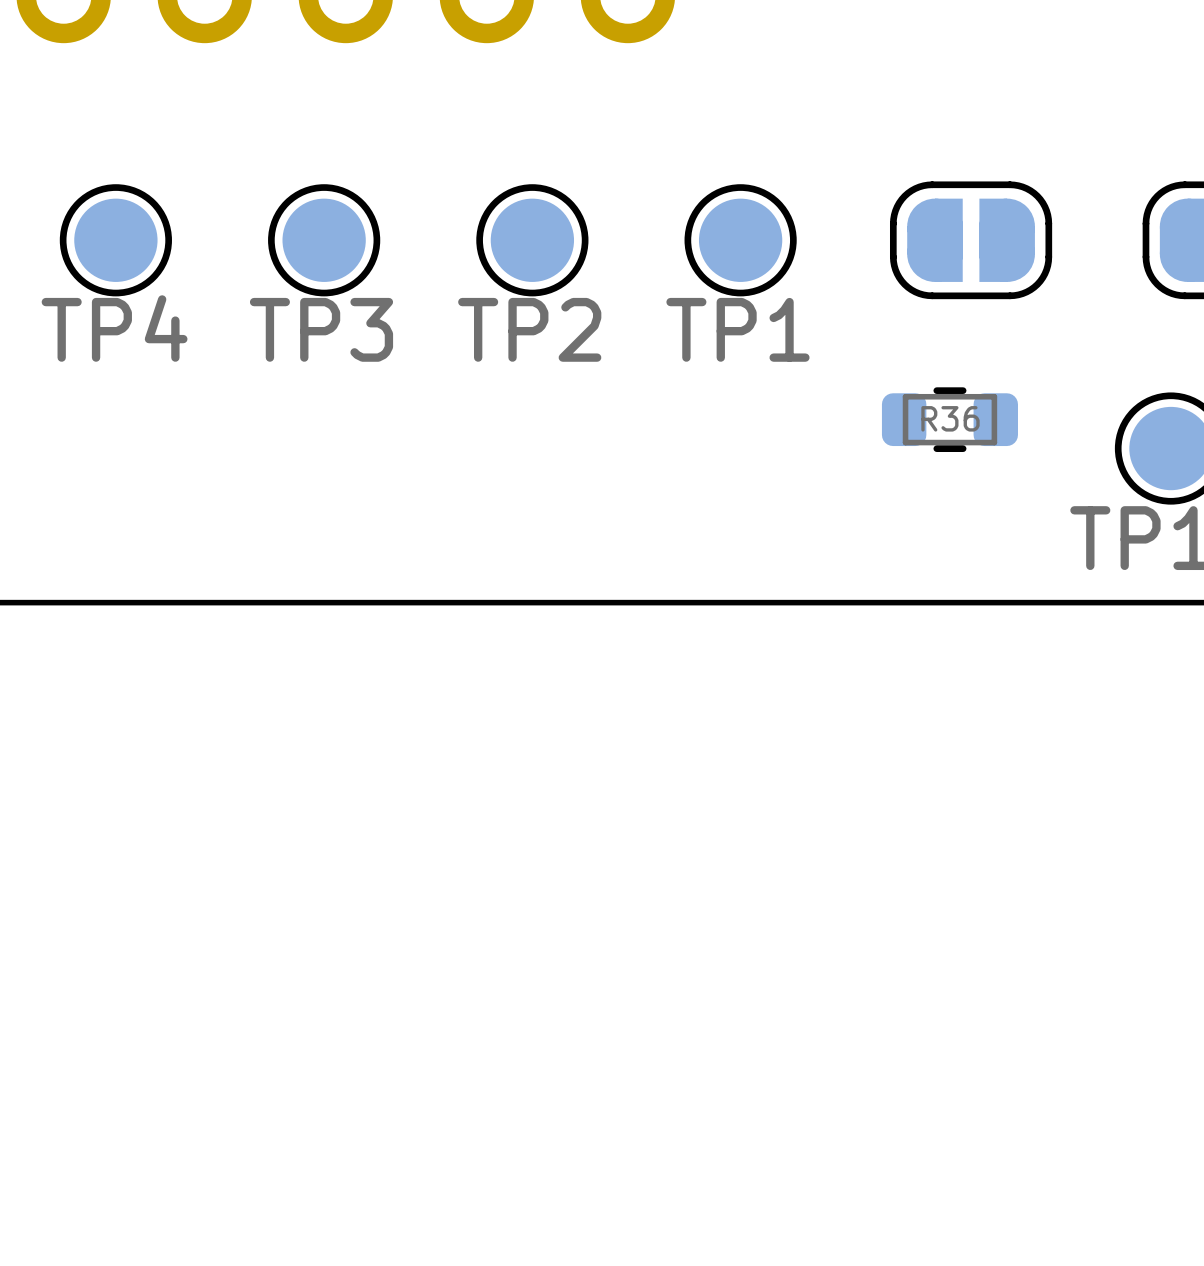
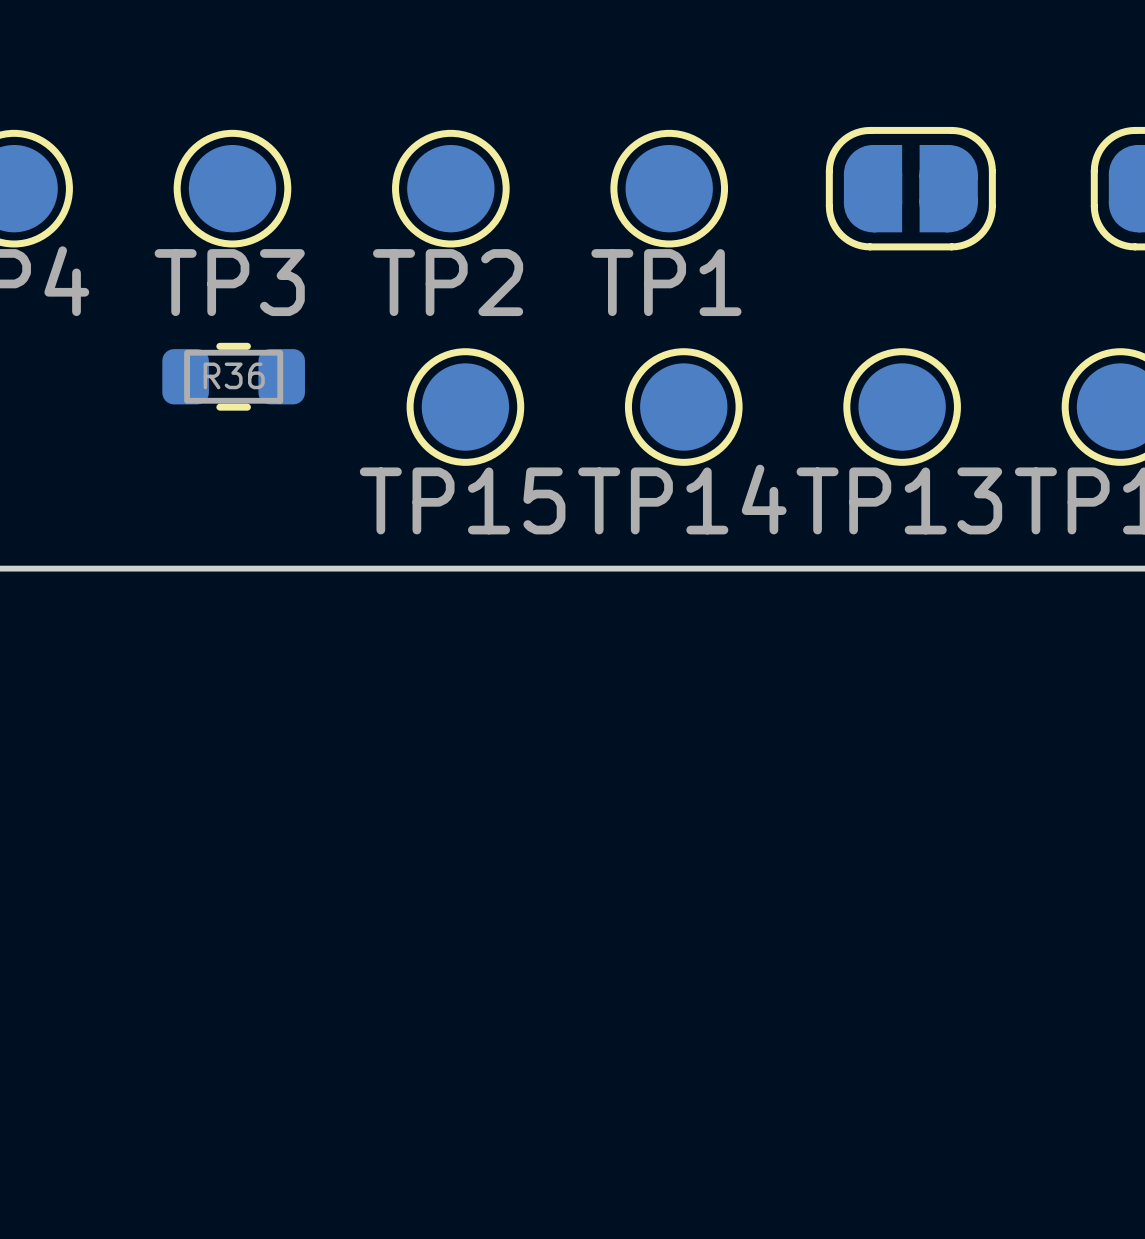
R36 position: (949, 419) -> (233, 376)
TP15: none -> (465, 407)
TP14: none -> (683, 407)
TP13: none -> (902, 407)

